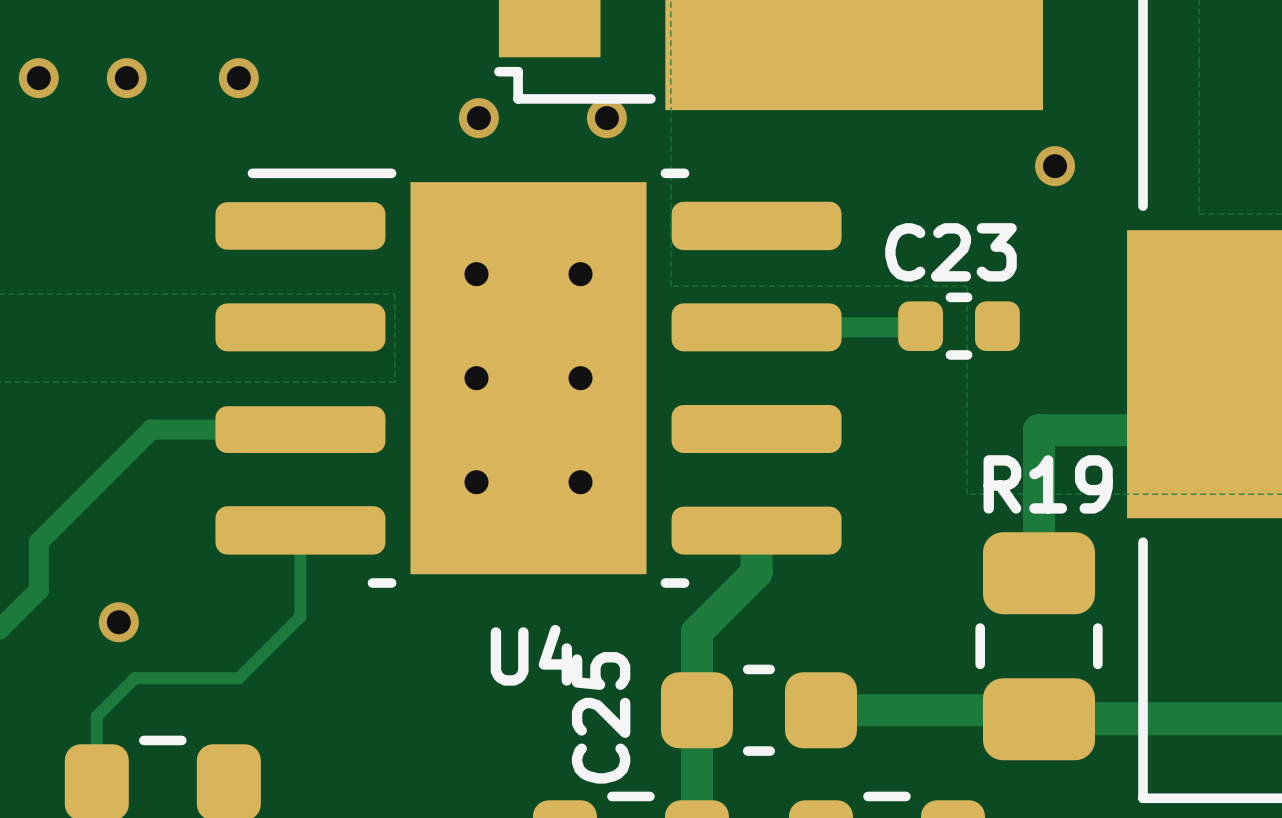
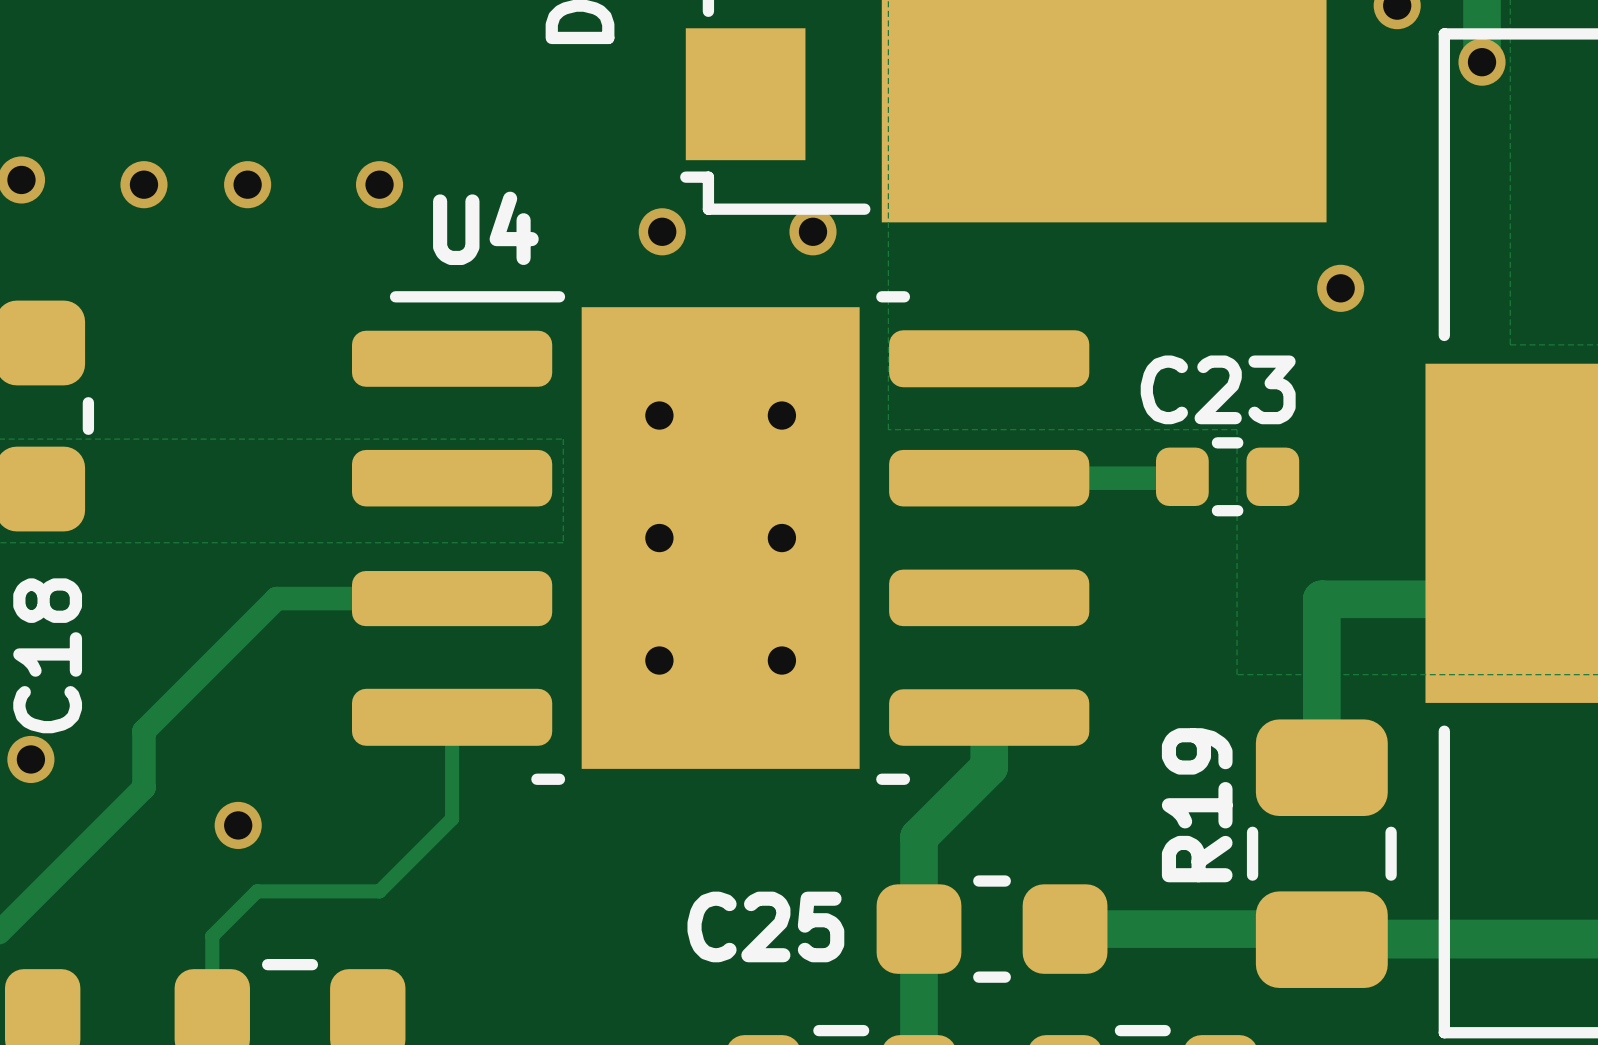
R19 name rotation: 0° (1048, 484) -> 90° counterclockwise (1197, 805)
U4 name position: U4 (534, 655) -> U4 (485, 228)
C25 name rotation: 0° (601, 717) -> 90° clockwise (765, 926)

